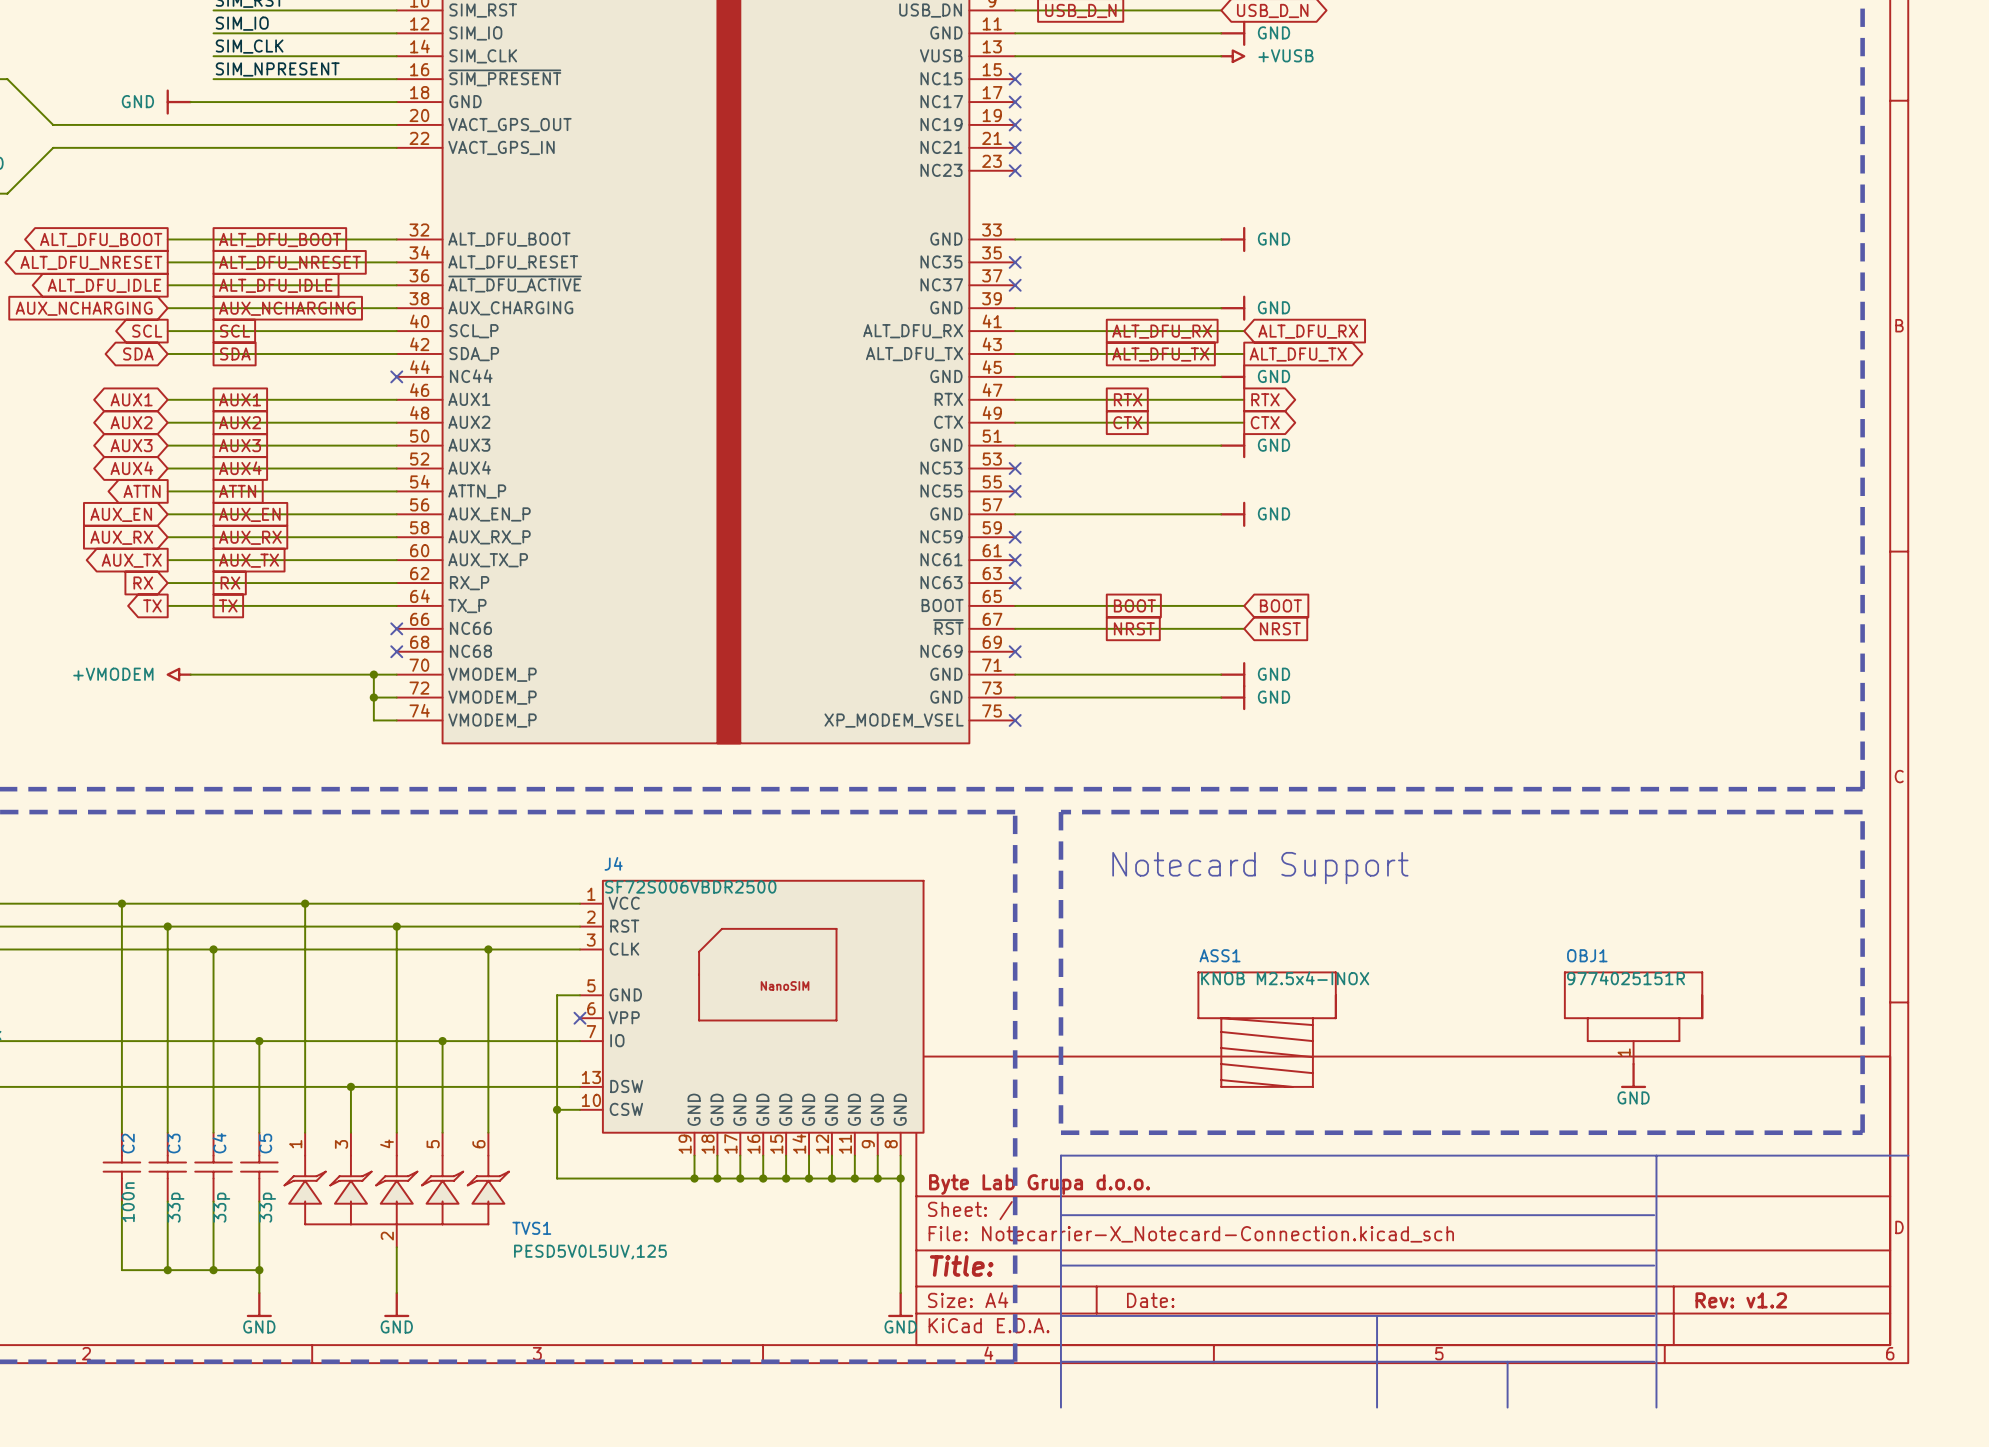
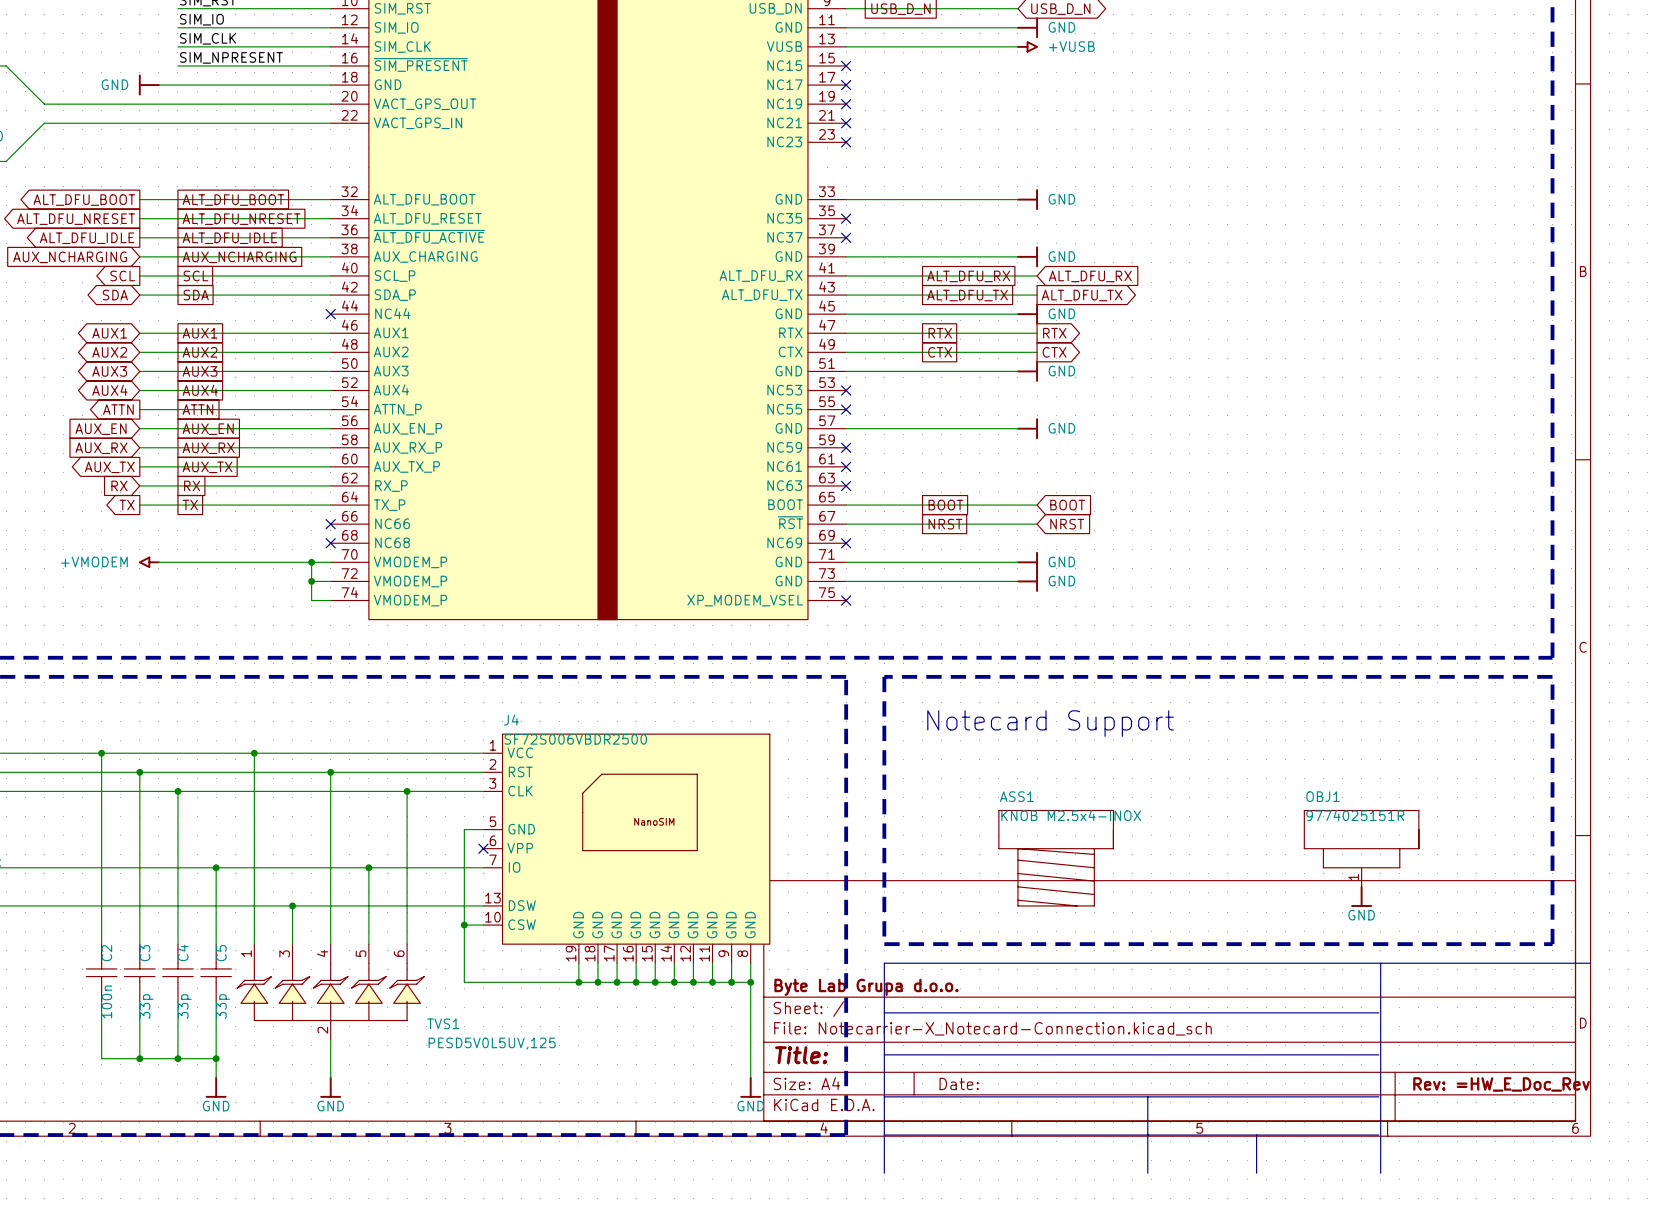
title block: Rev: v1.2 (1741, 1300) -> Rev: =HW_E_Doc_Rev (1501, 1084)

